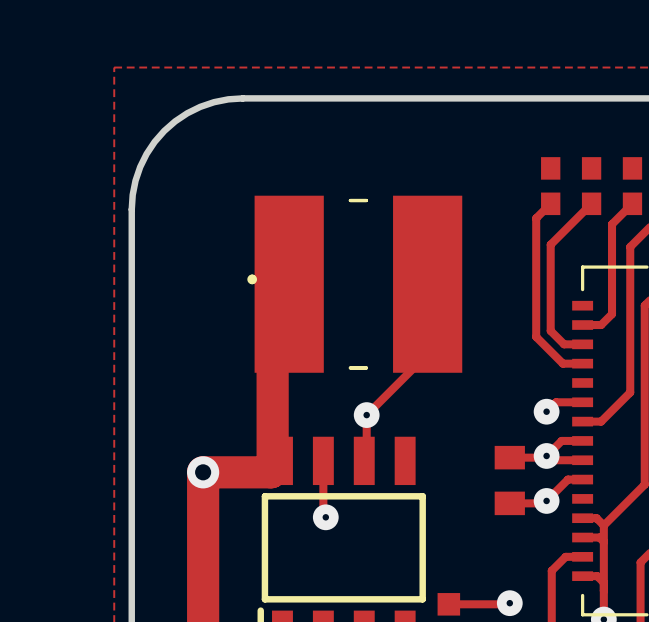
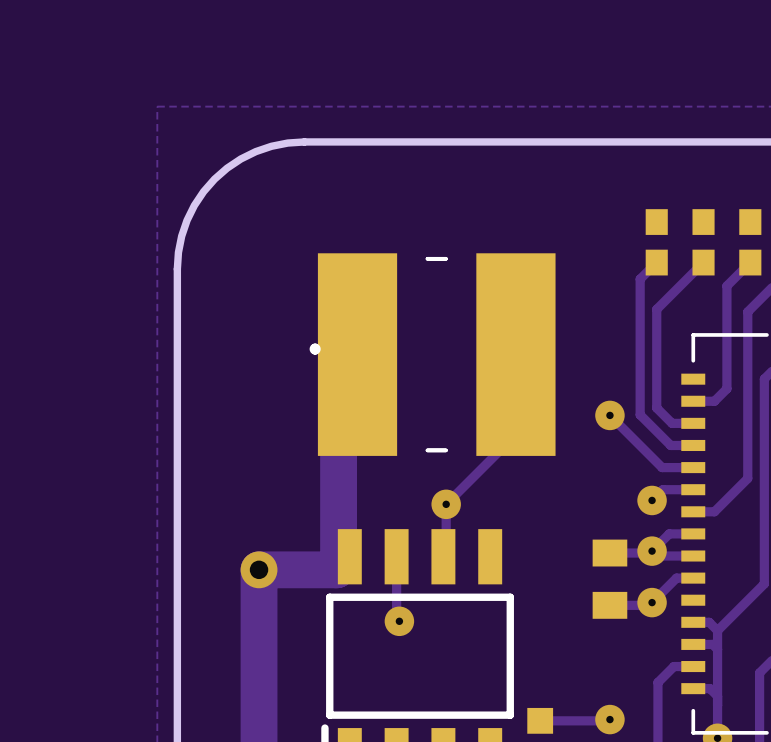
track: none -> (609, 415) (662, 467) (693, 467)
via: none -> (609, 415)

